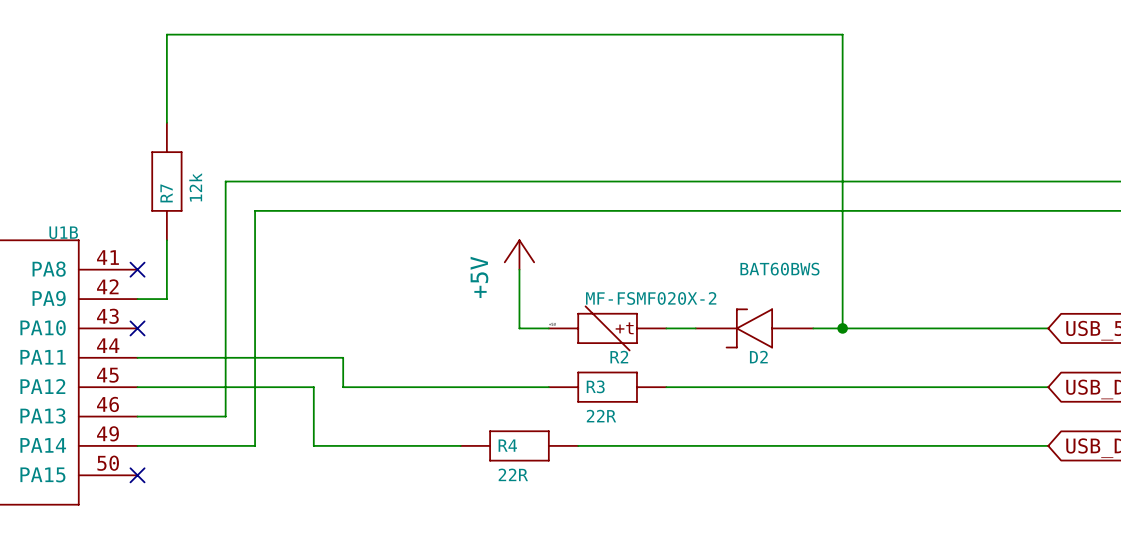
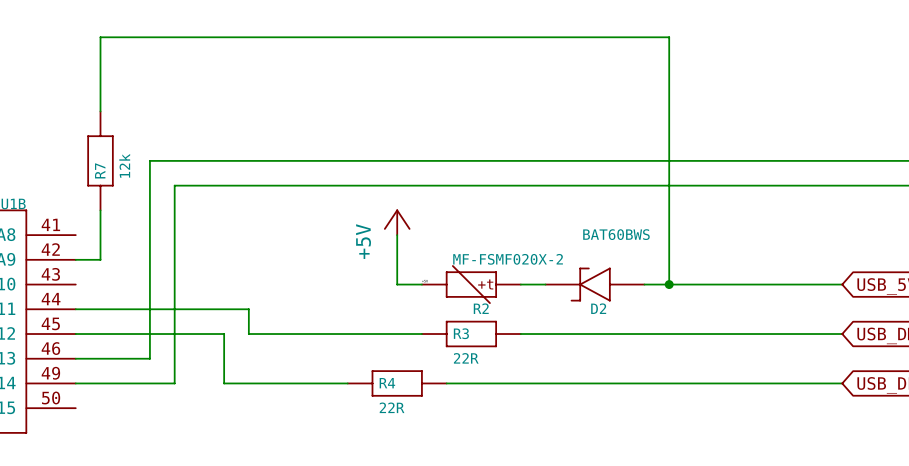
no-connect mark: (137, 269) -> none
no-connect mark: (137, 328) -> none
no-connect mark: (137, 475) -> none

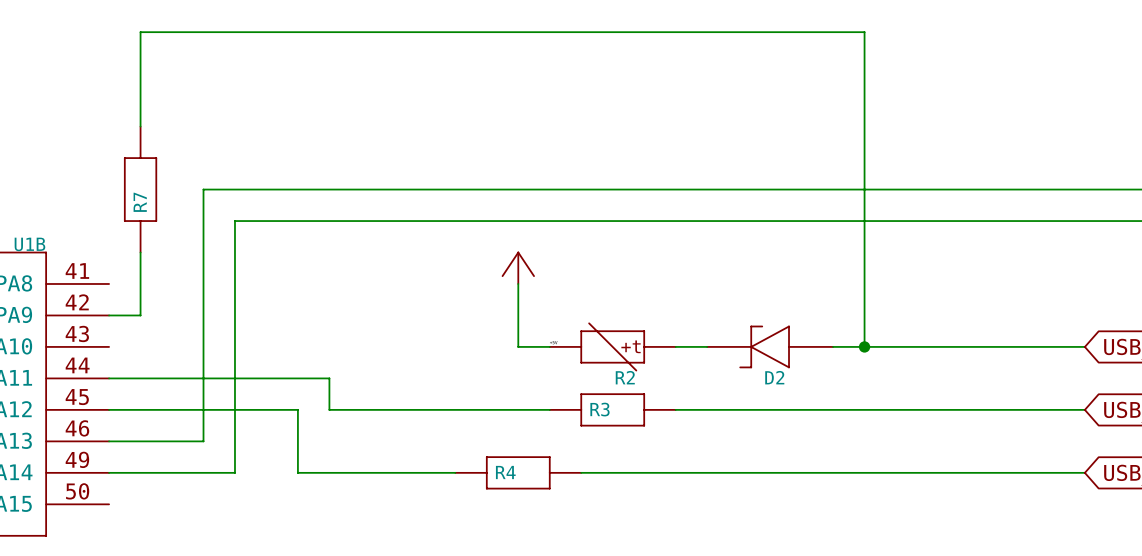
R7 value: 12k (124, 165) -> none
D2 value: BAT60BWS (616, 234) -> none
power symbol text: +5V (363, 241) -> none
R2 value: MF-FSMF020X-2 (508, 259) -> none
R3 value: 22R (466, 358) -> none
R4 value: 22R (392, 407) -> none

